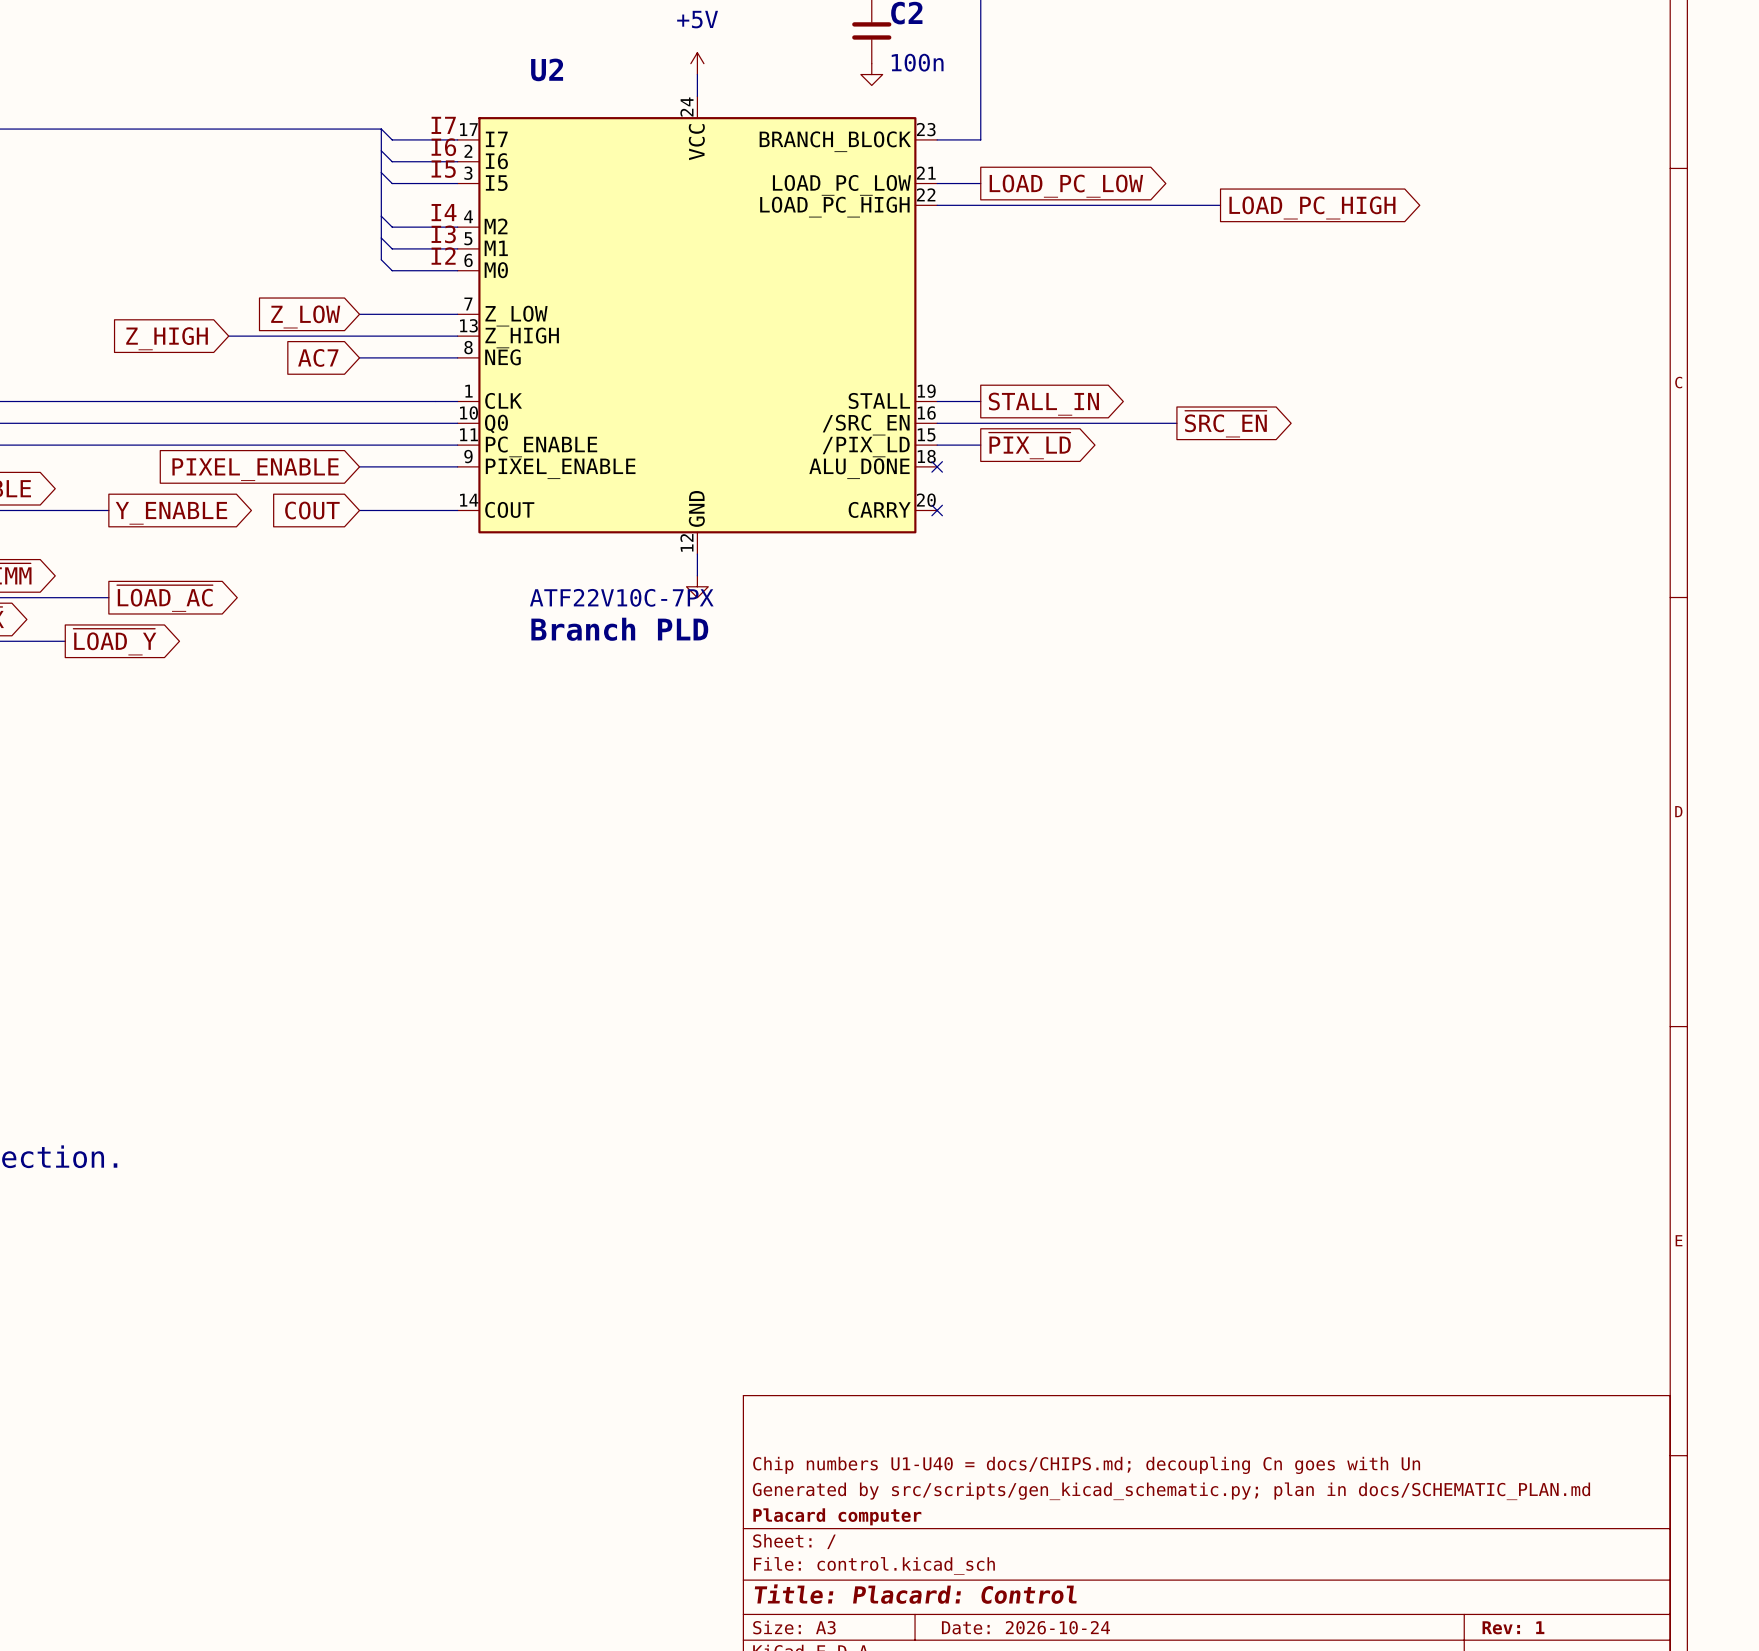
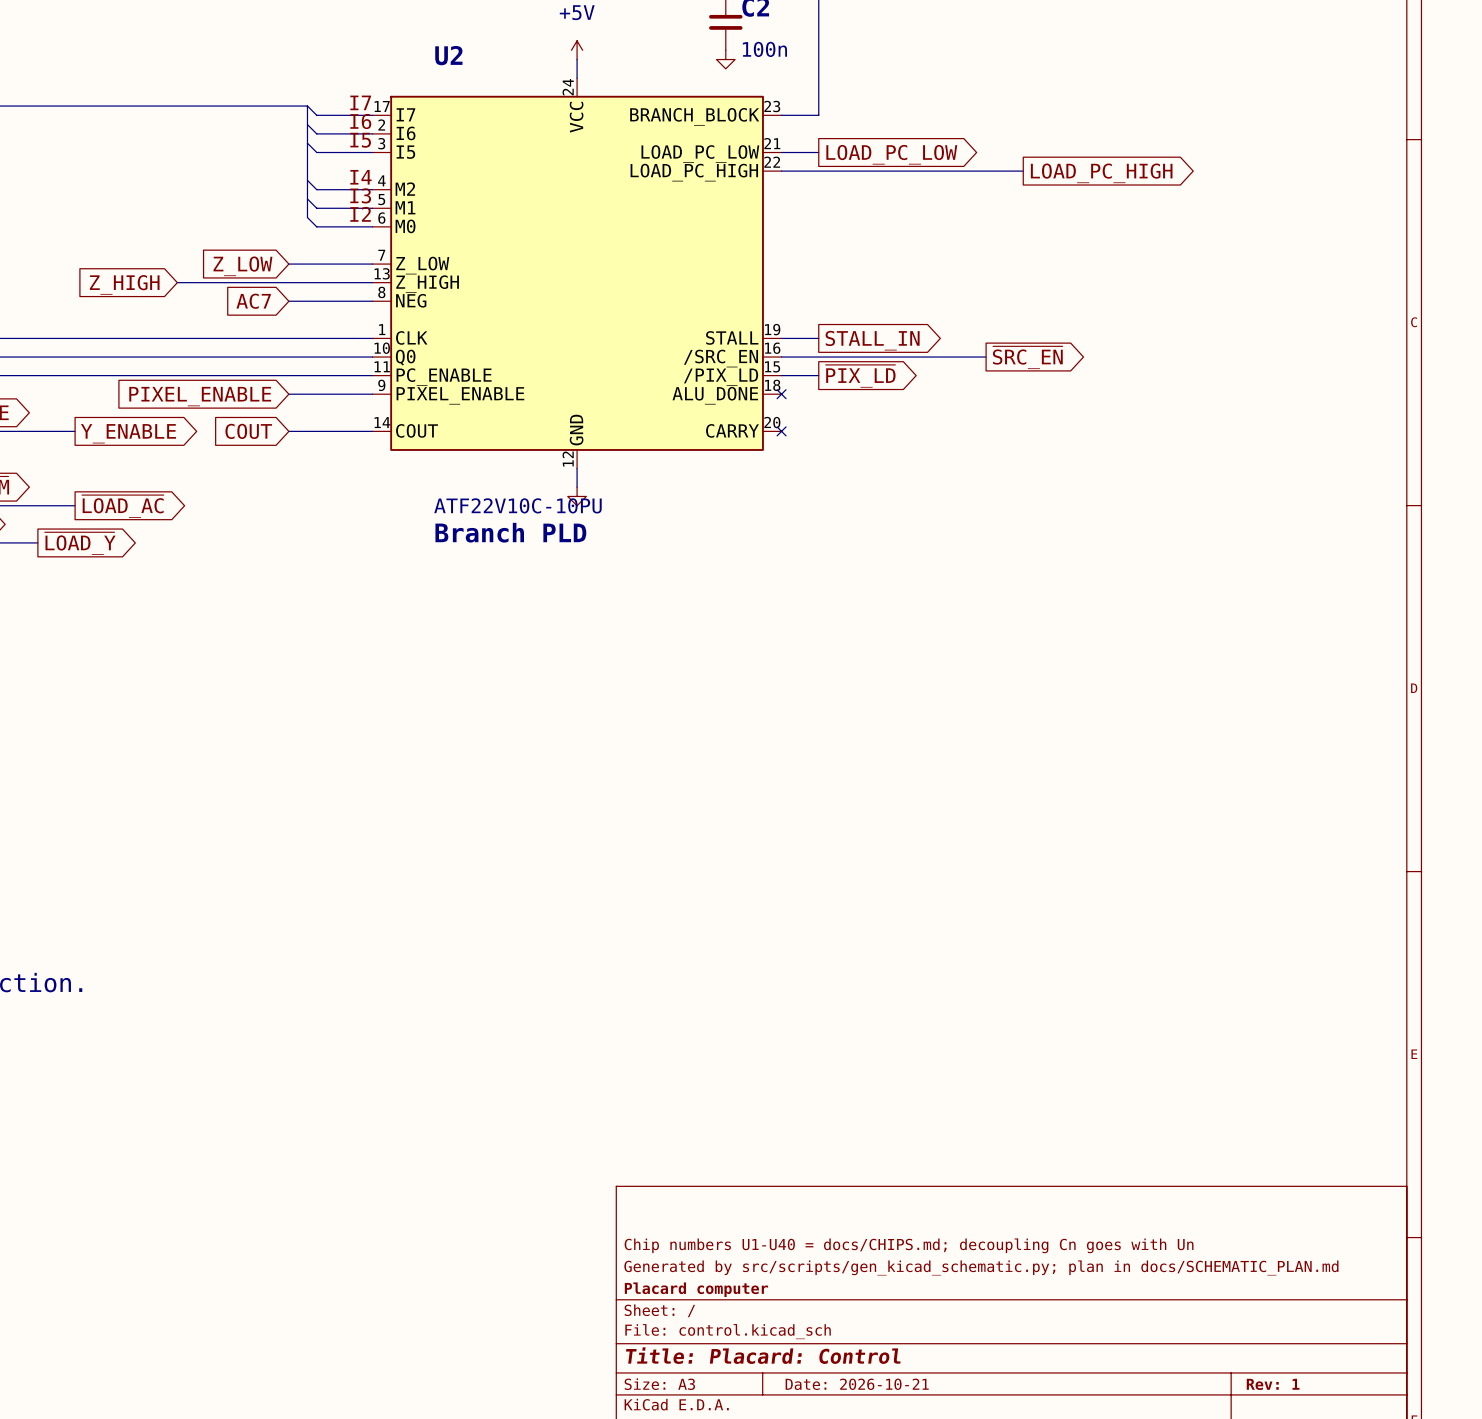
U2 value: ATF22V10C-7PX (621, 597) -> ATF22V10C-10PU (517, 505)
title block: Date: 2026-10-24 (1025, 1627) -> Date: 2026-10-21 (857, 1384)

